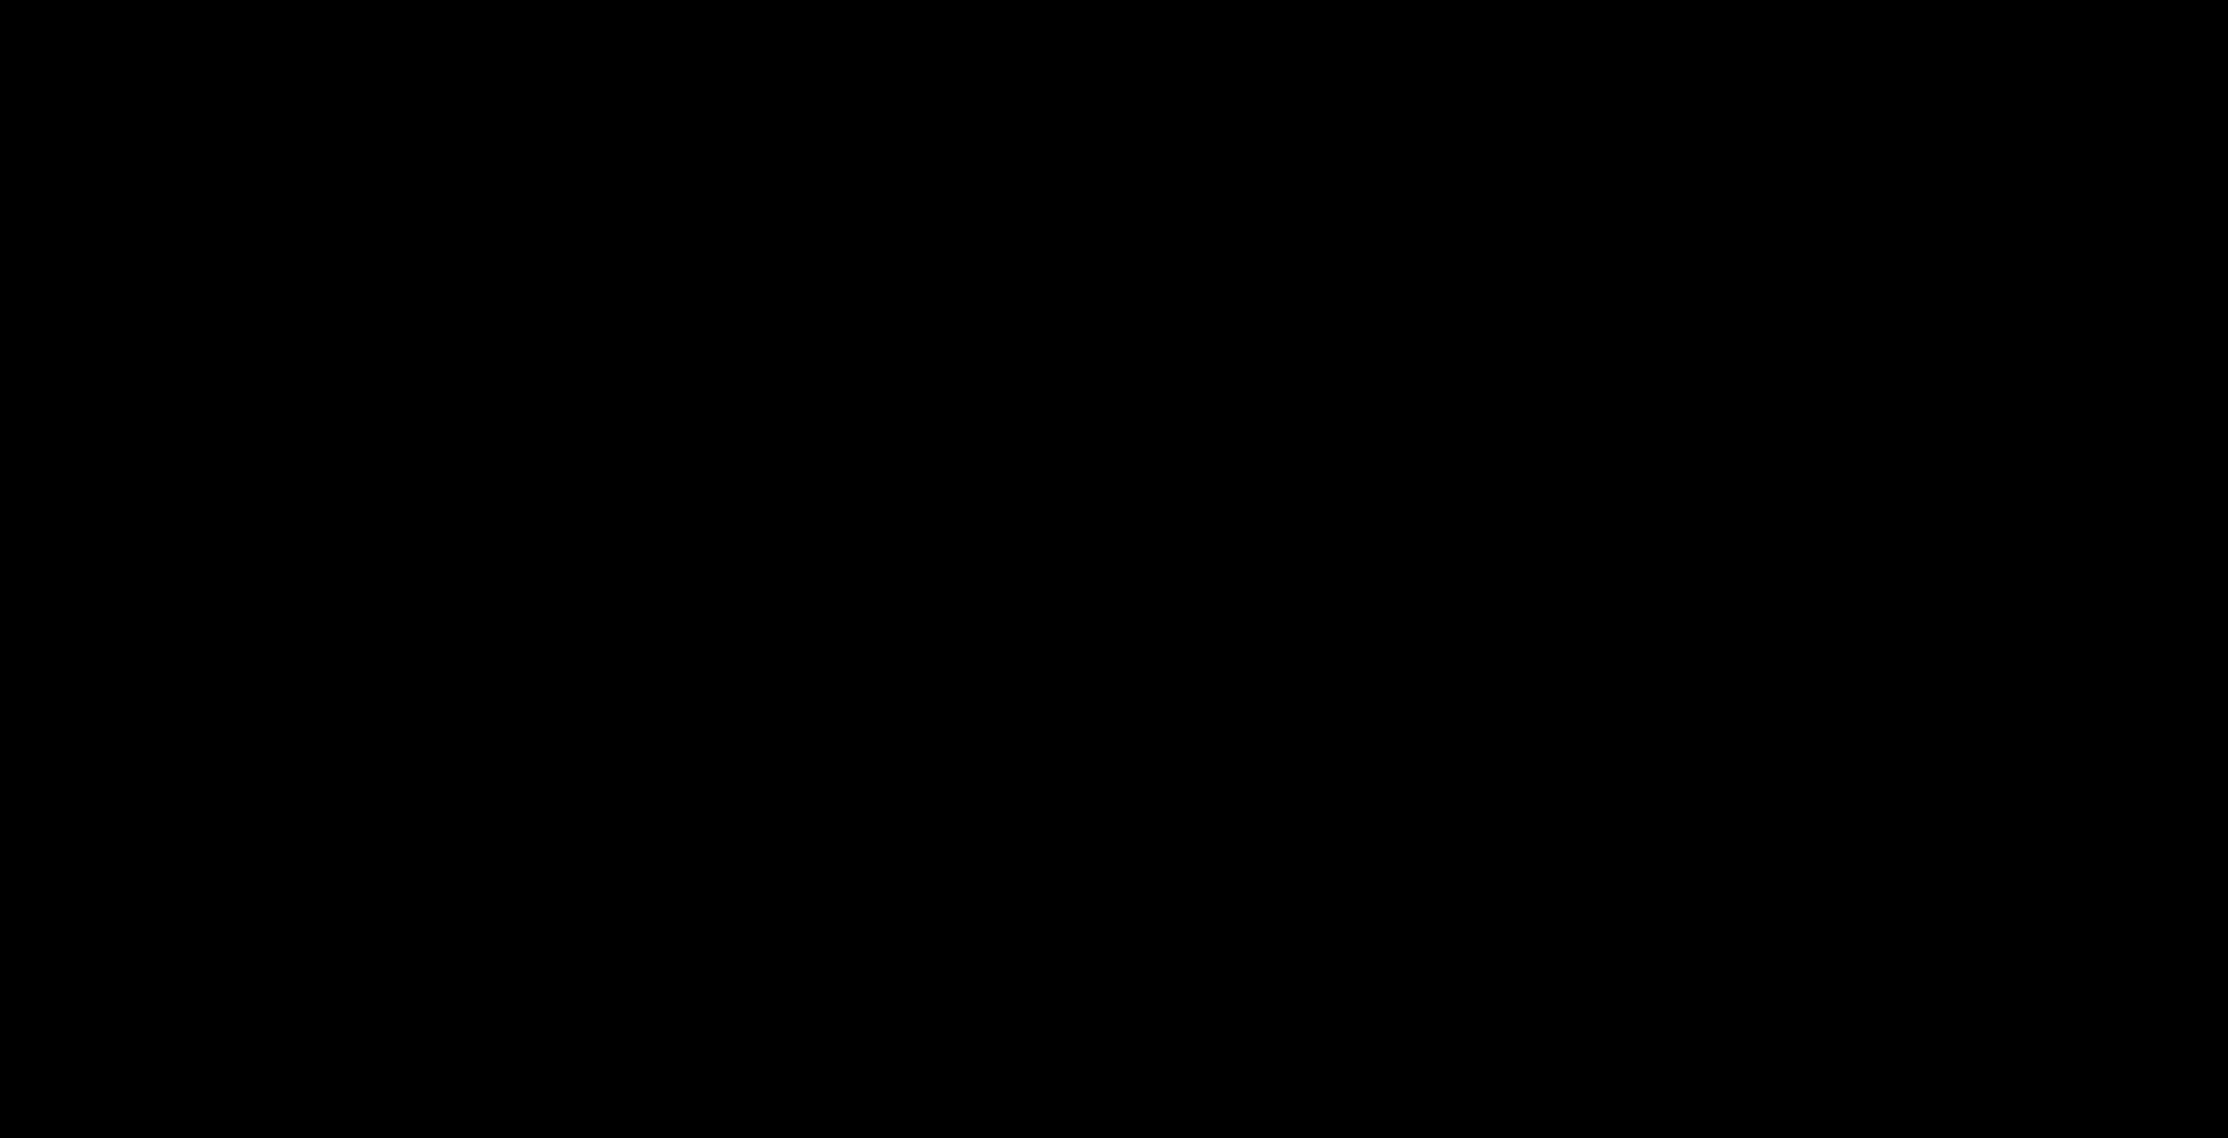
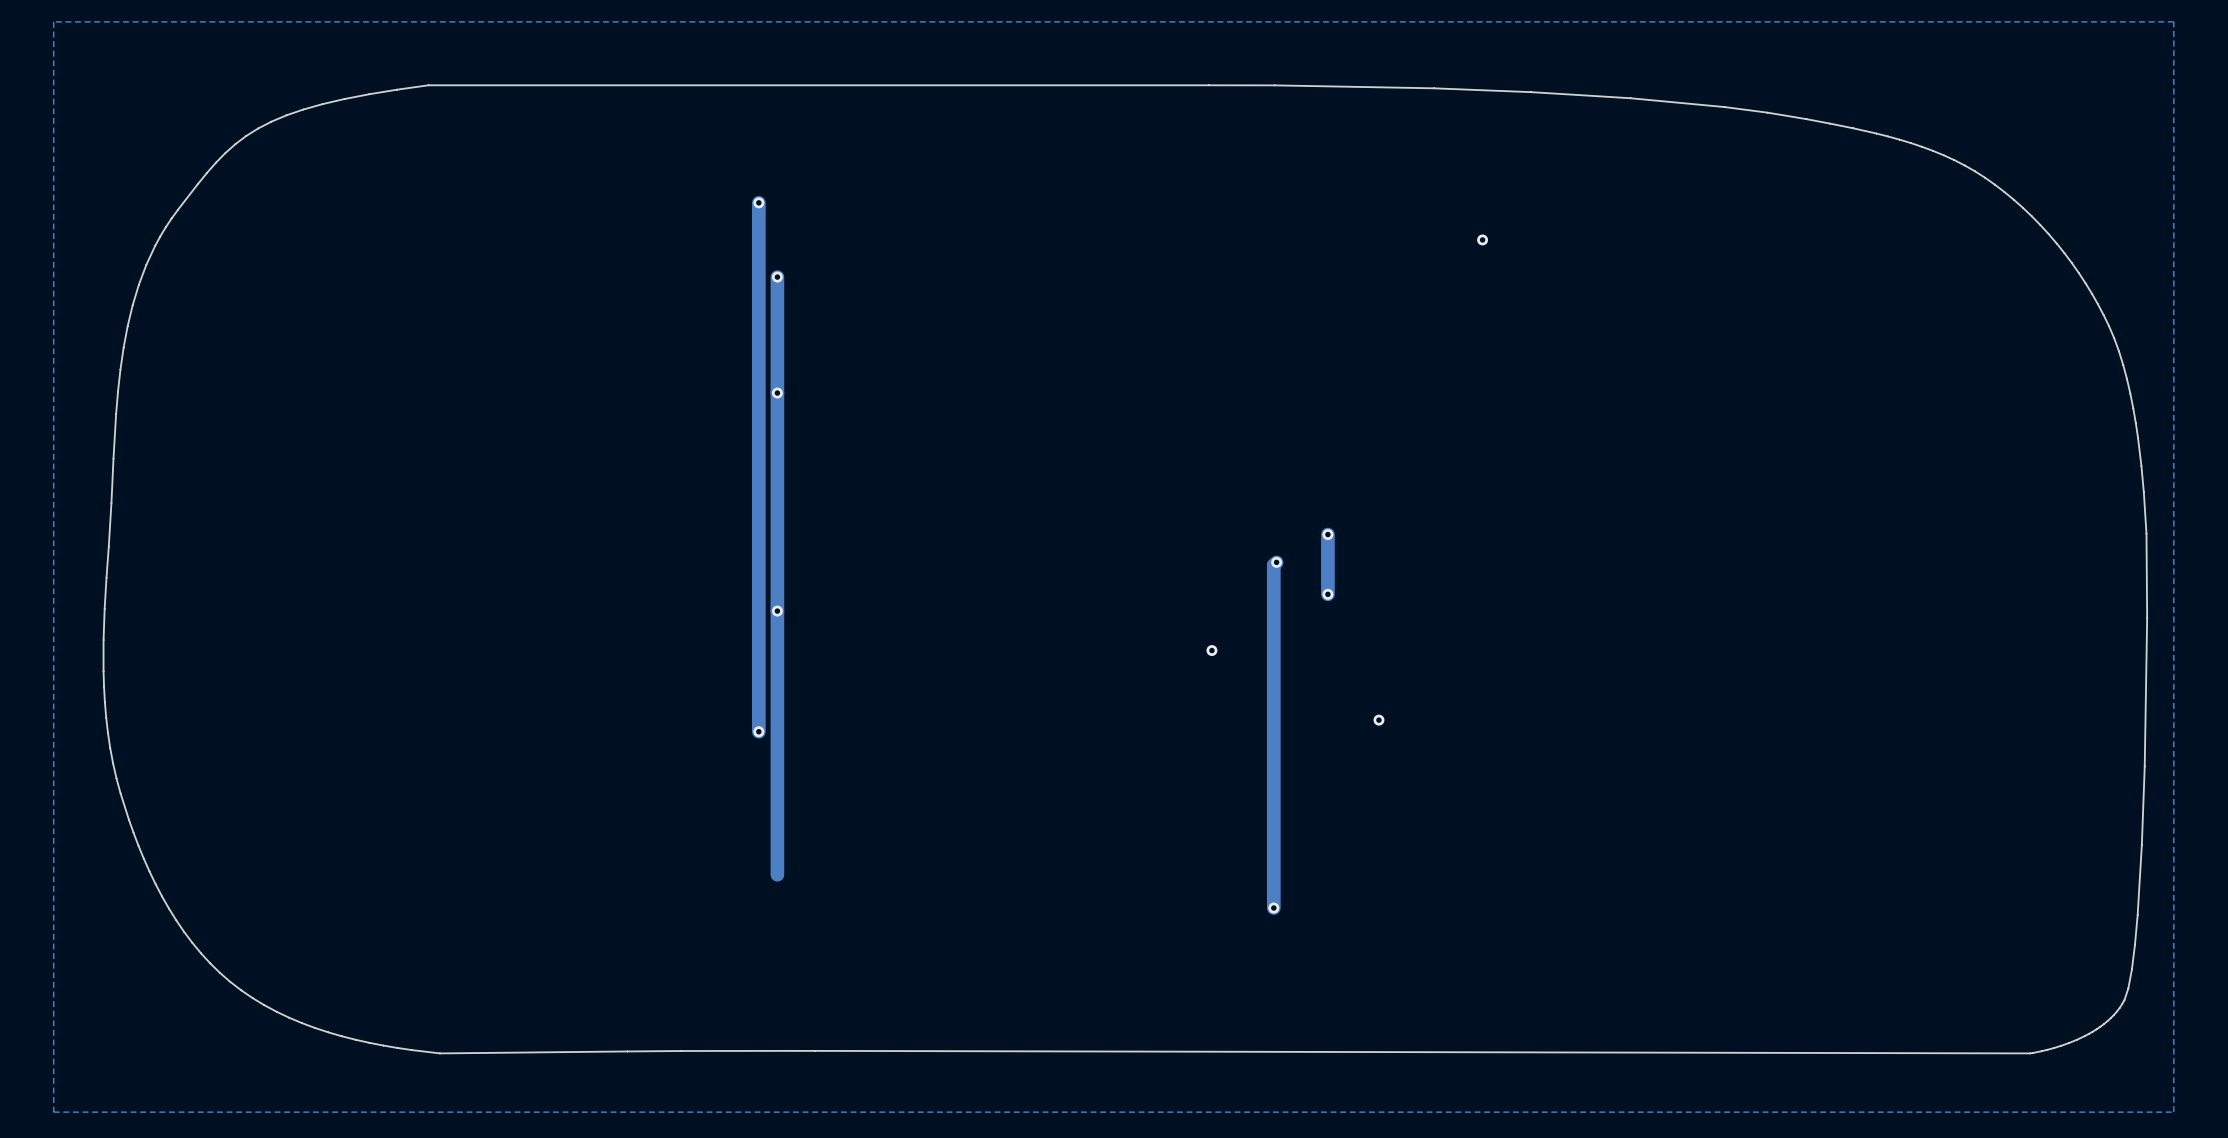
zone outline: none -> (2173, 21) (53, 21) (53, 1112) (2173, 1112) (2173, 21)
board edge: none -> (1274, 85) (1434, 88) (1630, 98) (1724, 107) (1829, 123) (1899, 139) (1954, 160) (1975, 171) (2004, 192) (2048, 234) (2085, 283) (2114, 338) (2123, 365) (2133, 408) (2143, 492) (2146, 533) (2147, 618) (2144, 766) (2137, 914) (2128, 988) (2122, 1004) (2107, 1021) (2076, 1039) (2030, 1053) (814, 1050) (439, 1053) (355, 1039) (314, 1027) (289, 1017) (252, 998) (230, 981) (192, 942) (168, 908) (149, 871) (133, 832) (116, 778) (110, 748) (104, 702) (104, 608) (118, 391) (123, 347) (132, 305) (146, 264) (165, 227) (207, 172) (235, 144) (271, 121) (303, 109) (344, 99) (428, 85) (1274, 85)
track: none -> (758, 202) (758, 731)
via: none -> (758, 202)
via: none -> (1482, 239)
track: none -> (777, 277) (777, 874)
via: none -> (777, 277)
via: none -> (777, 393)
track: none -> (1327, 534) (1327, 594)
via: none -> (1327, 534)
track: none -> (1276, 562) (1273, 565) (1273, 908)
via: none -> (1276, 562)
via: none -> (1327, 594)
via: none -> (777, 611)
via: none -> (1211, 650)
via: none -> (1378, 720)
via: none -> (758, 731)
via: none -> (1273, 908)

